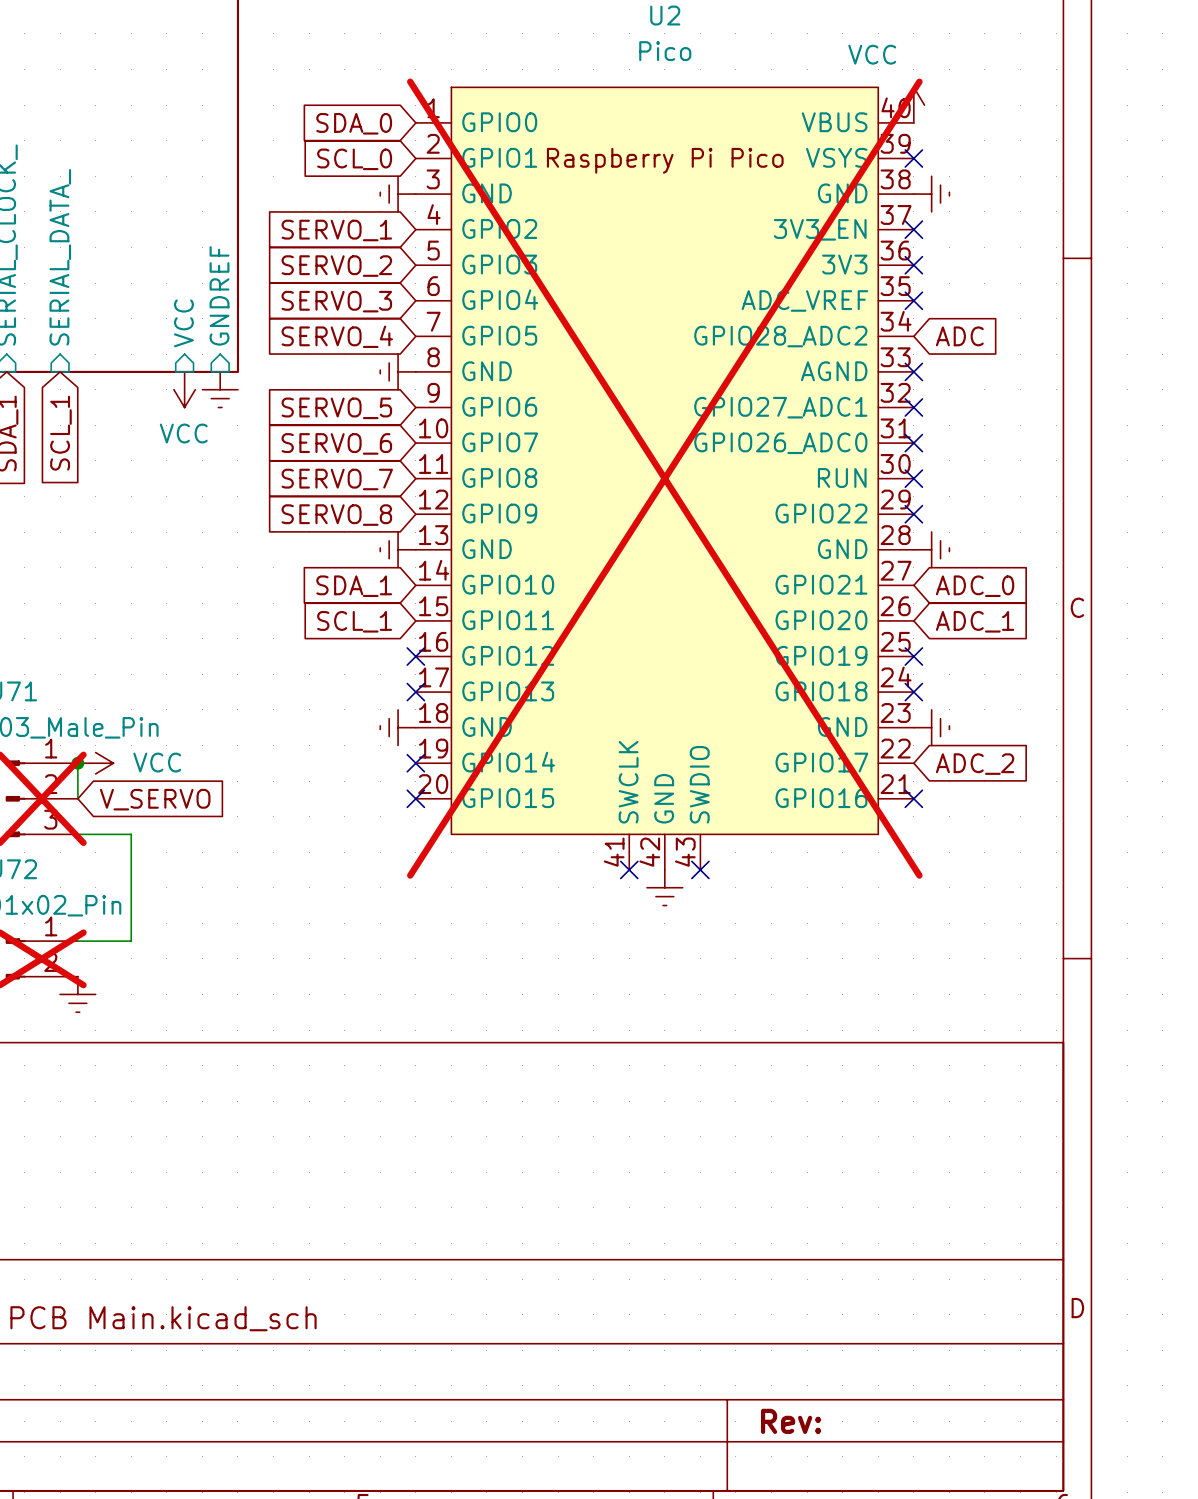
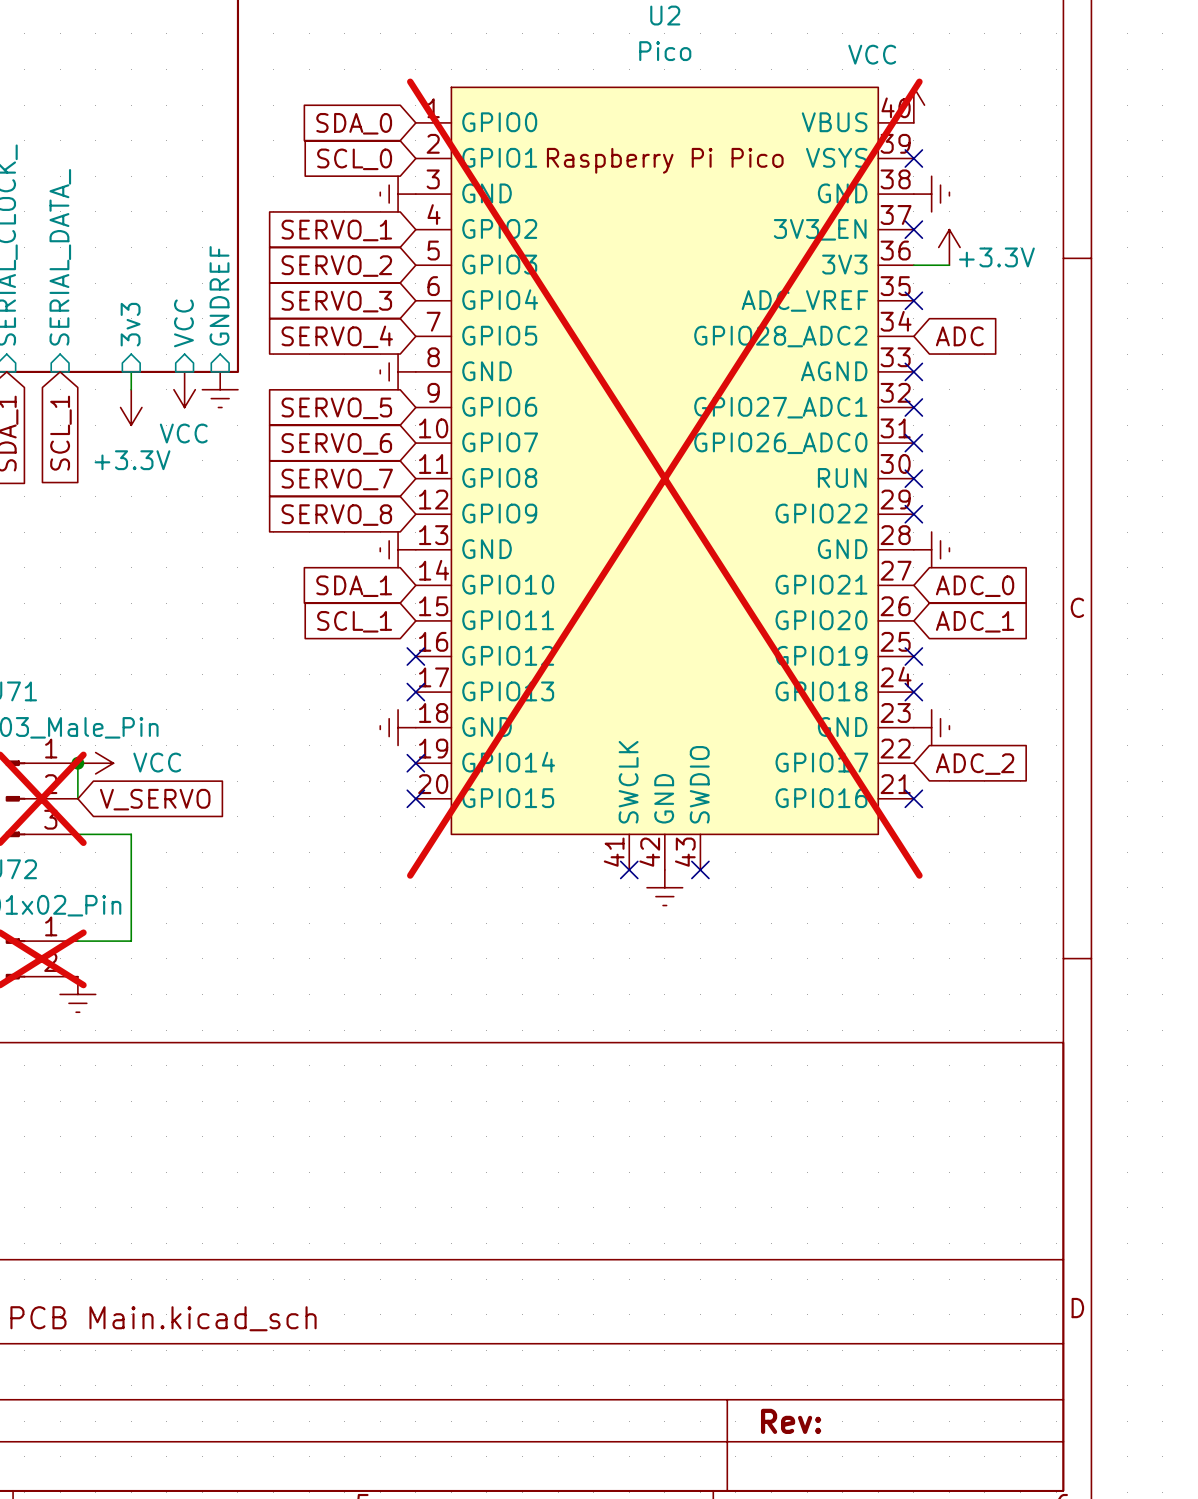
power symbol: none -> +3.3V (949, 247)
wire: none -> (913, 265) (949, 265)
no-connect mark: (913, 265) -> none
sheet pin: none -> 3v3 (130, 324)
wire: none -> (131, 371) (131, 389)
power symbol: none -> +3.3V (131, 407)

